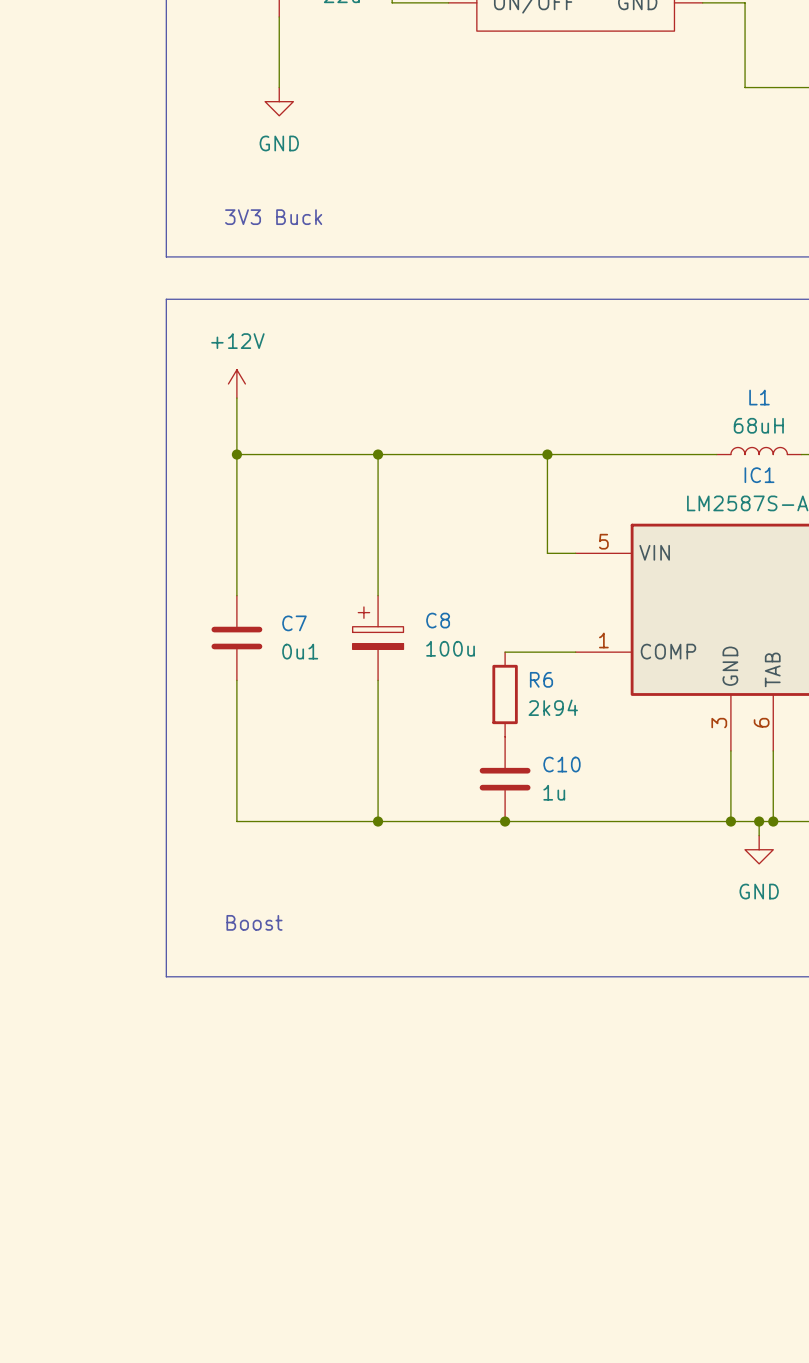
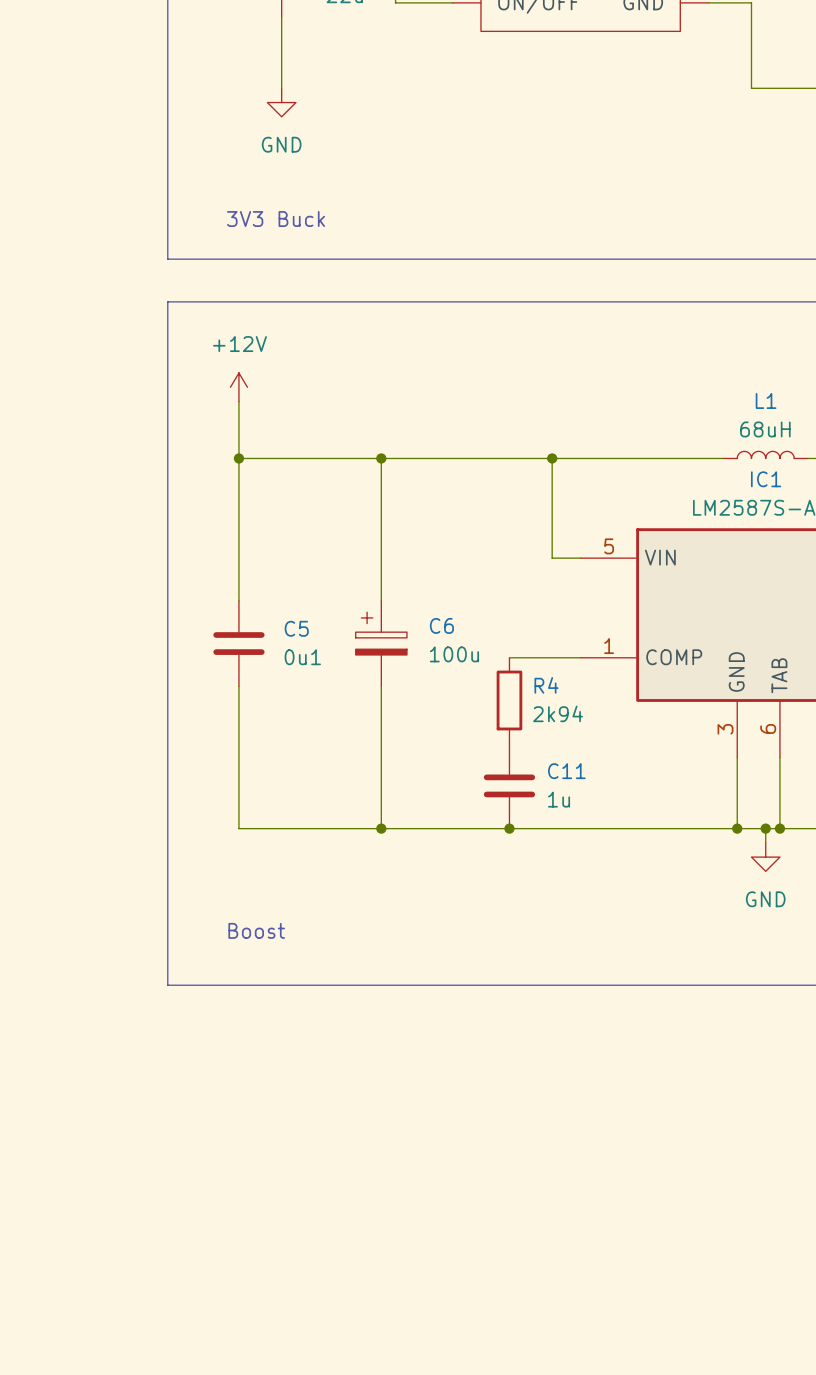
C8 name: C8 (438, 620) -> C6 (441, 625)
C7 name: C7 (294, 623) -> C5 (296, 628)
R6 name: R6 (541, 679) -> R4 (546, 685)
C10 name: C10 (561, 764) -> C11 (566, 771)

